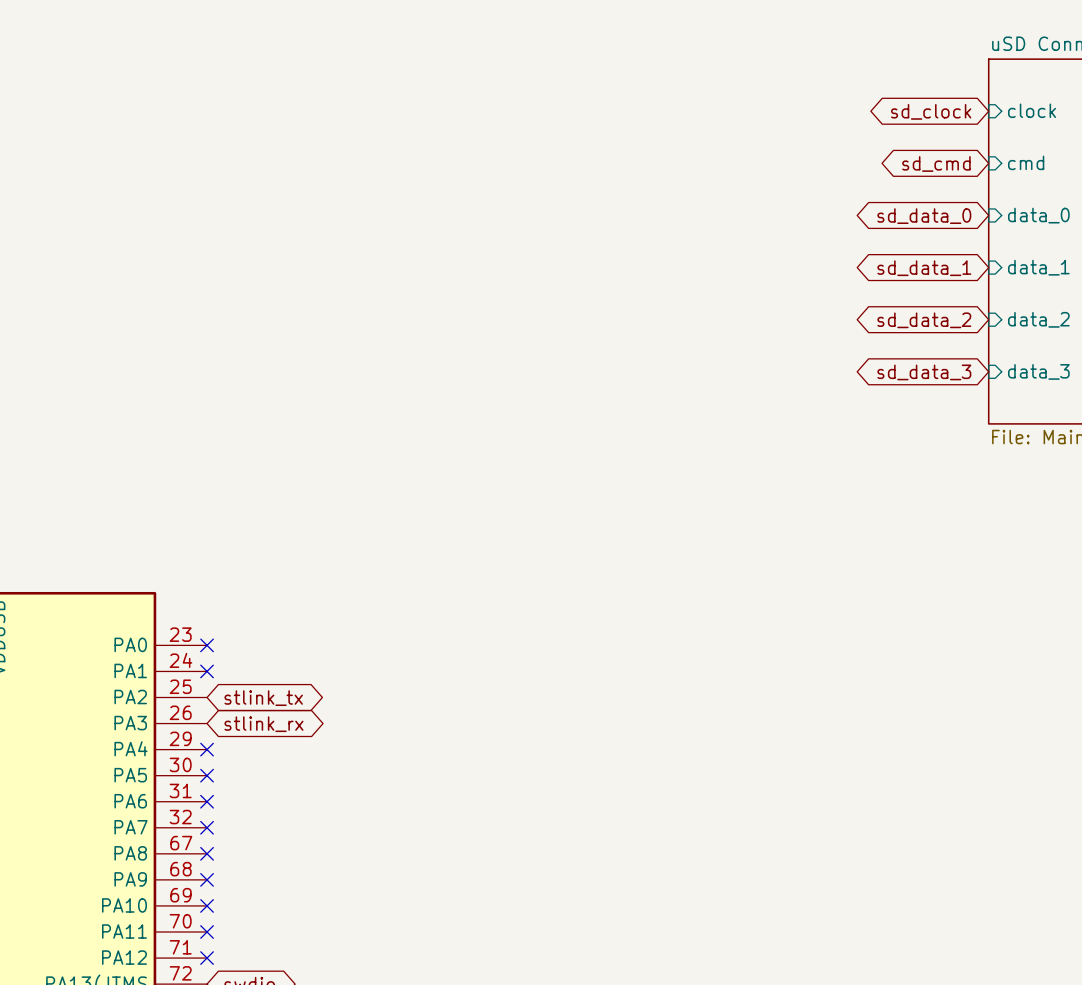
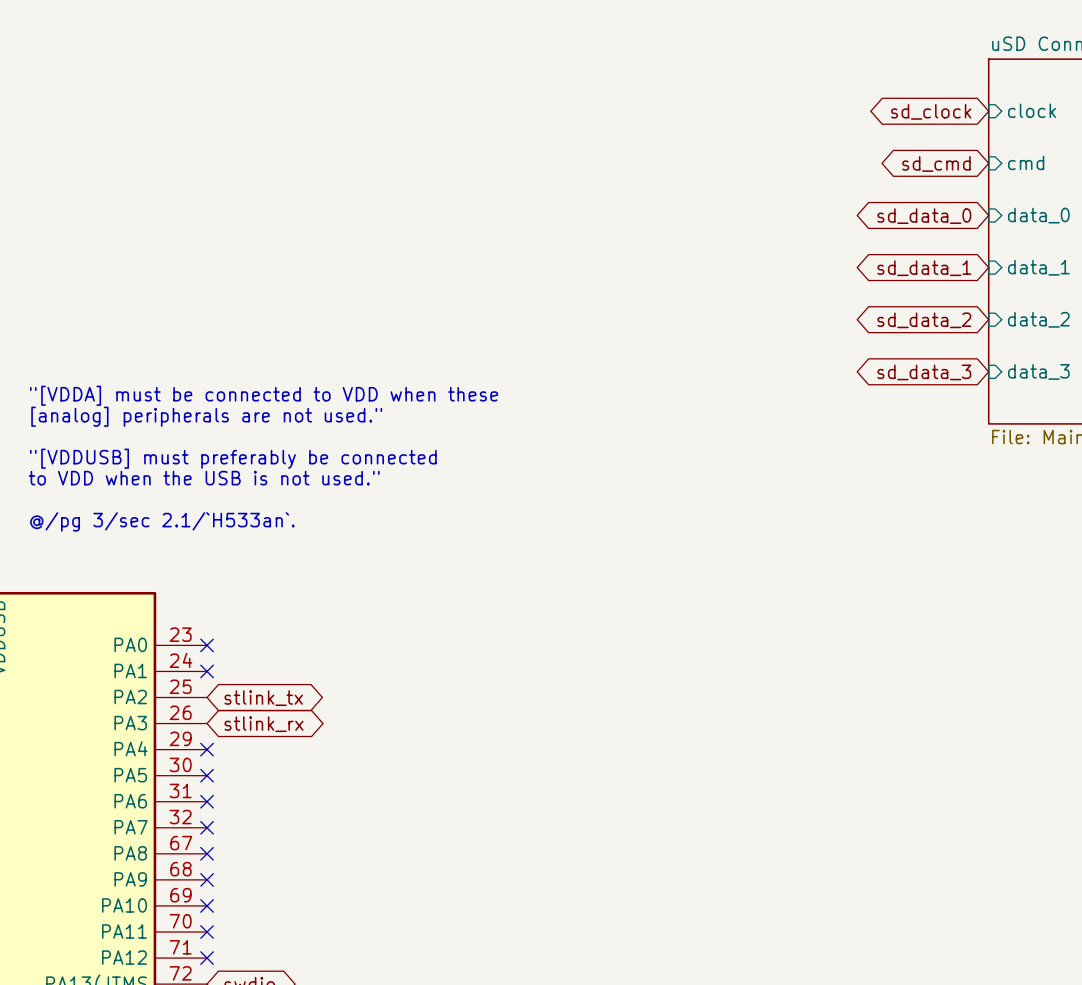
text: none -> "[VDDA] must be connected to VDD when these (264, 395)
text: none -> [analog] peripherals are not used." (206, 416)
text: none -> "[VDDUSB] must preferably be connected (233, 458)
text: none -> to VDD when the USB is not used." (204, 478)
text: none -> @/pg 3/sec 2.1/`H533an`. (162, 521)

